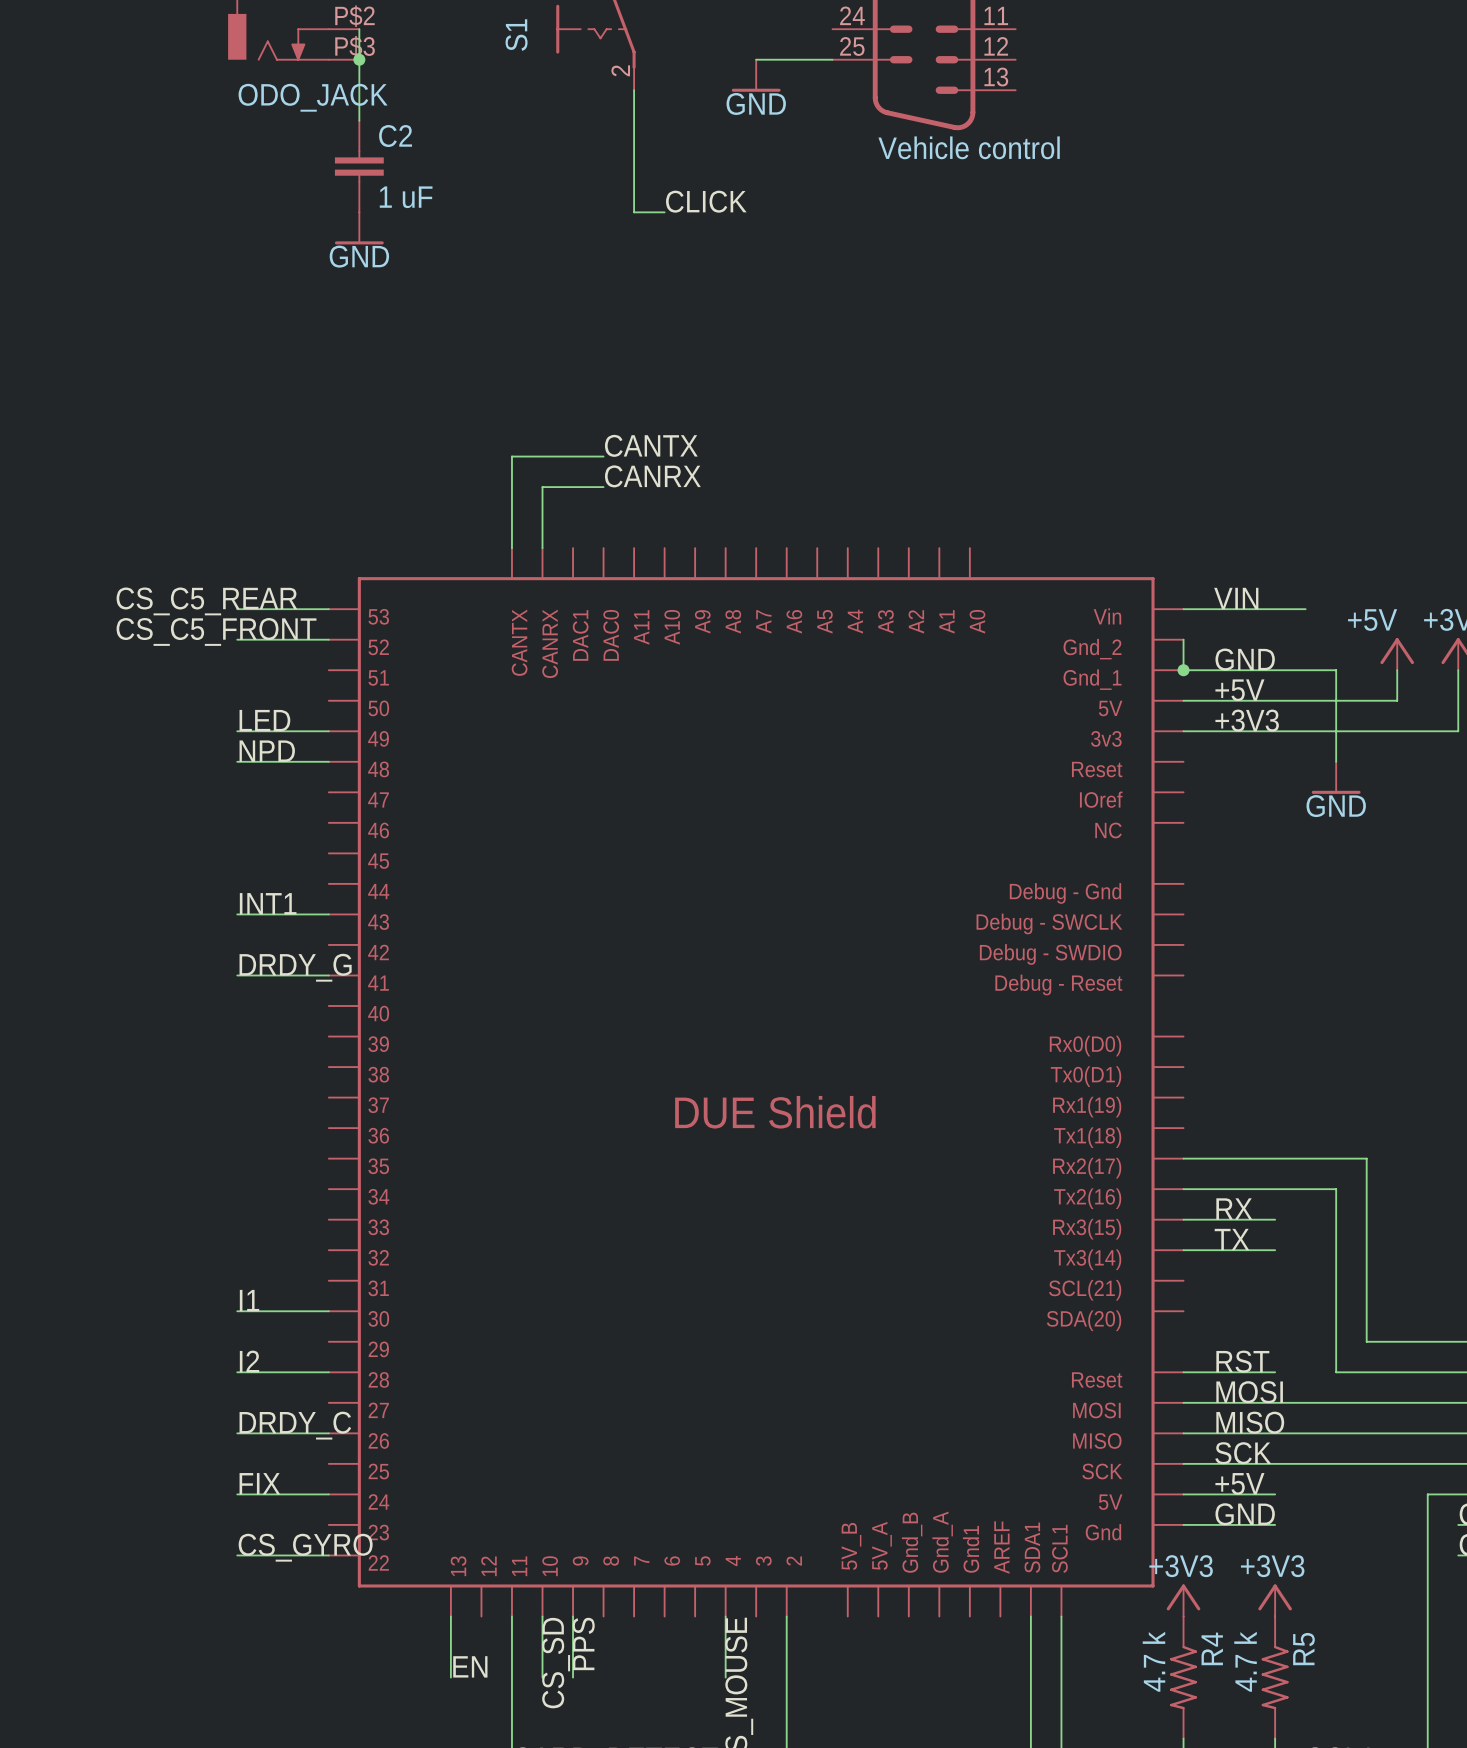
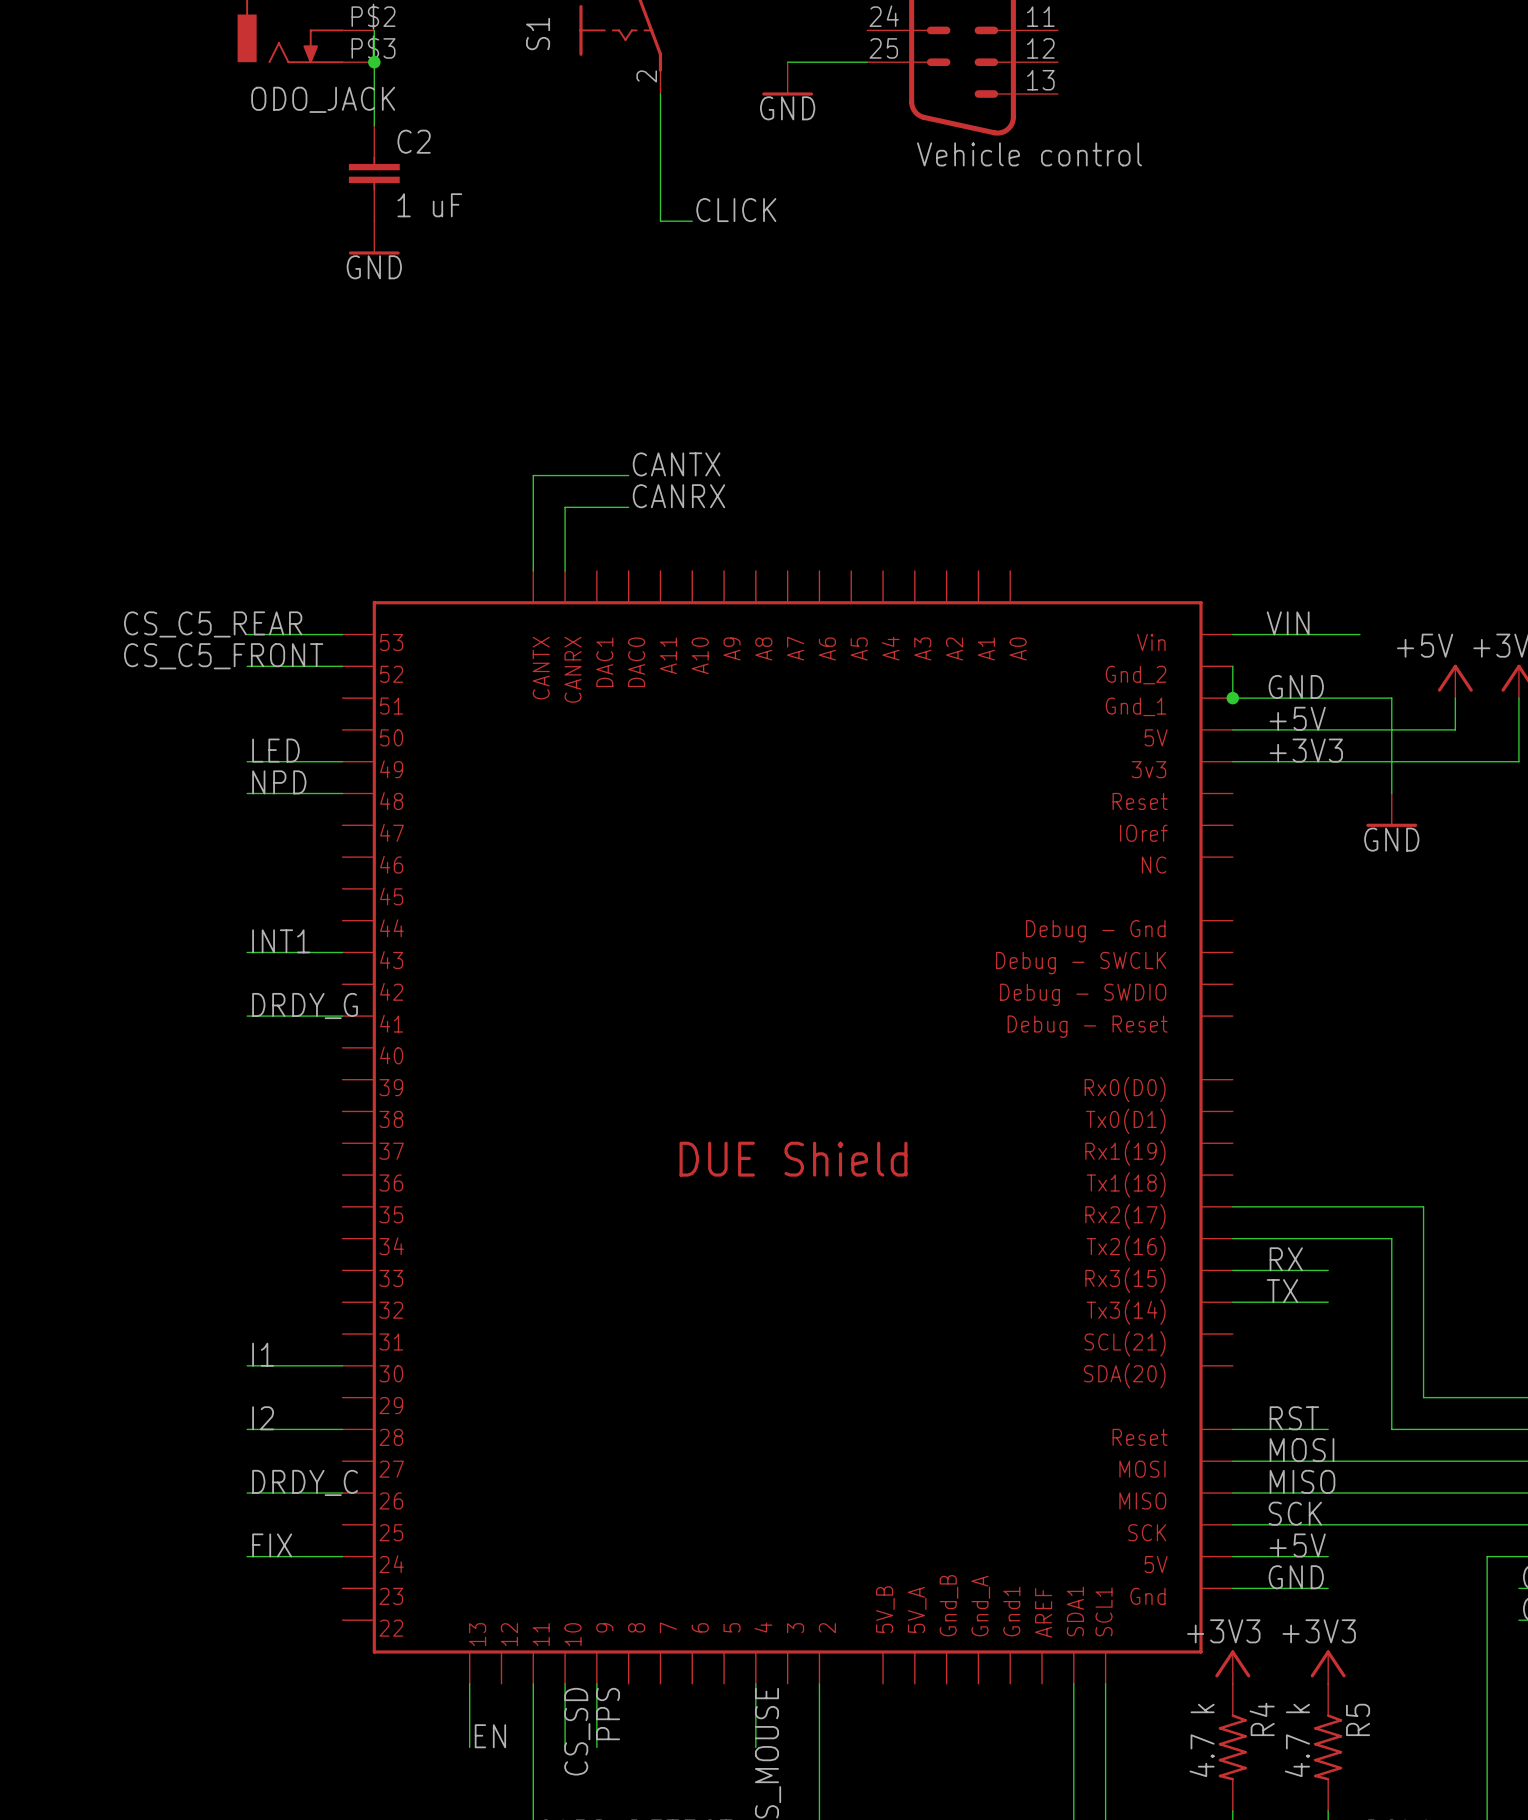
label: CS_GYRO (305, 1547) -> none
wire: (237, 1555) (328, 1555) -> none

